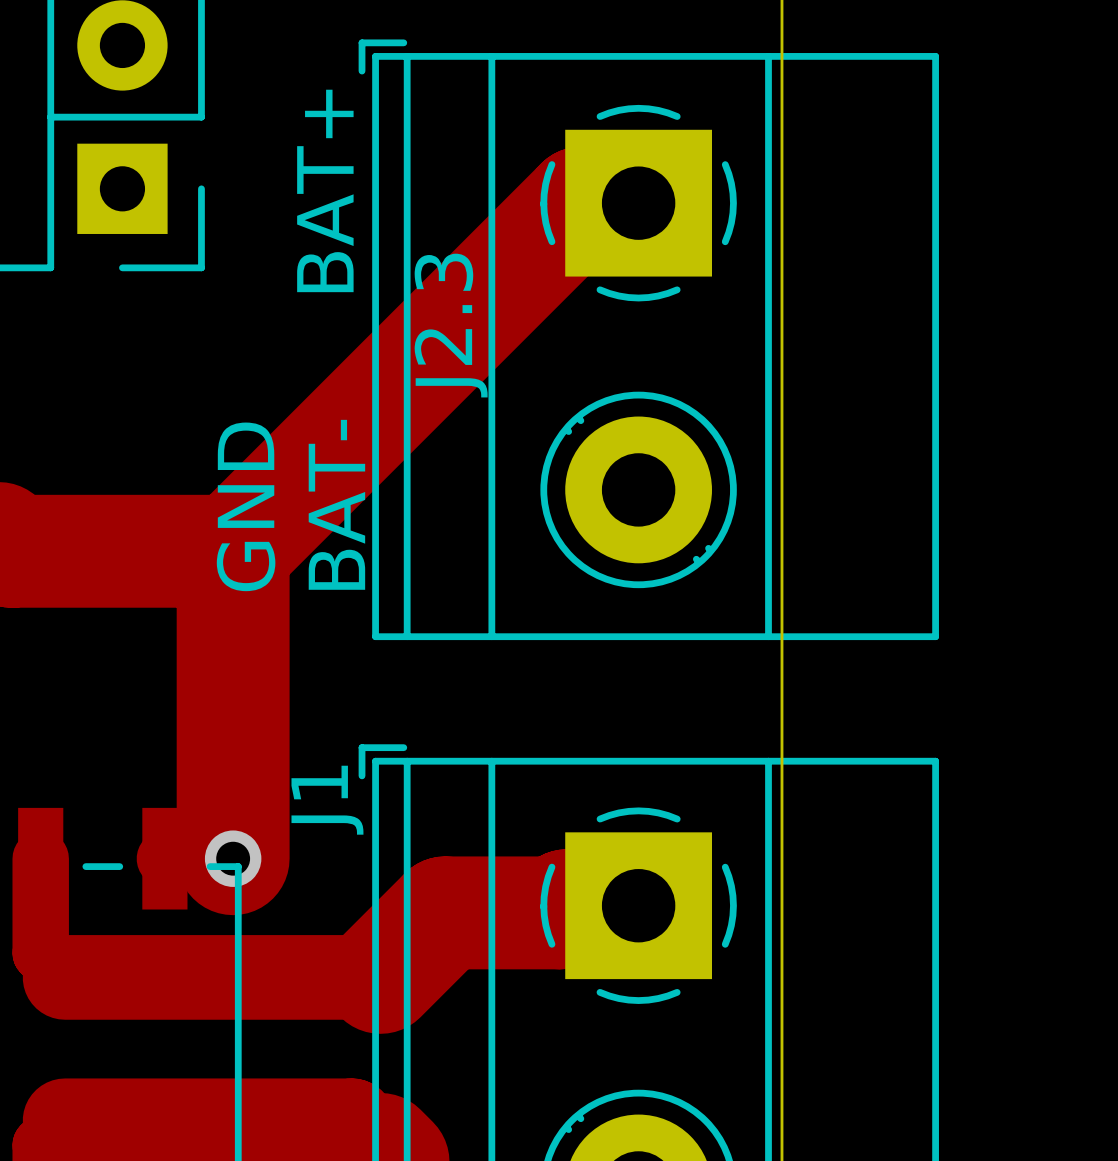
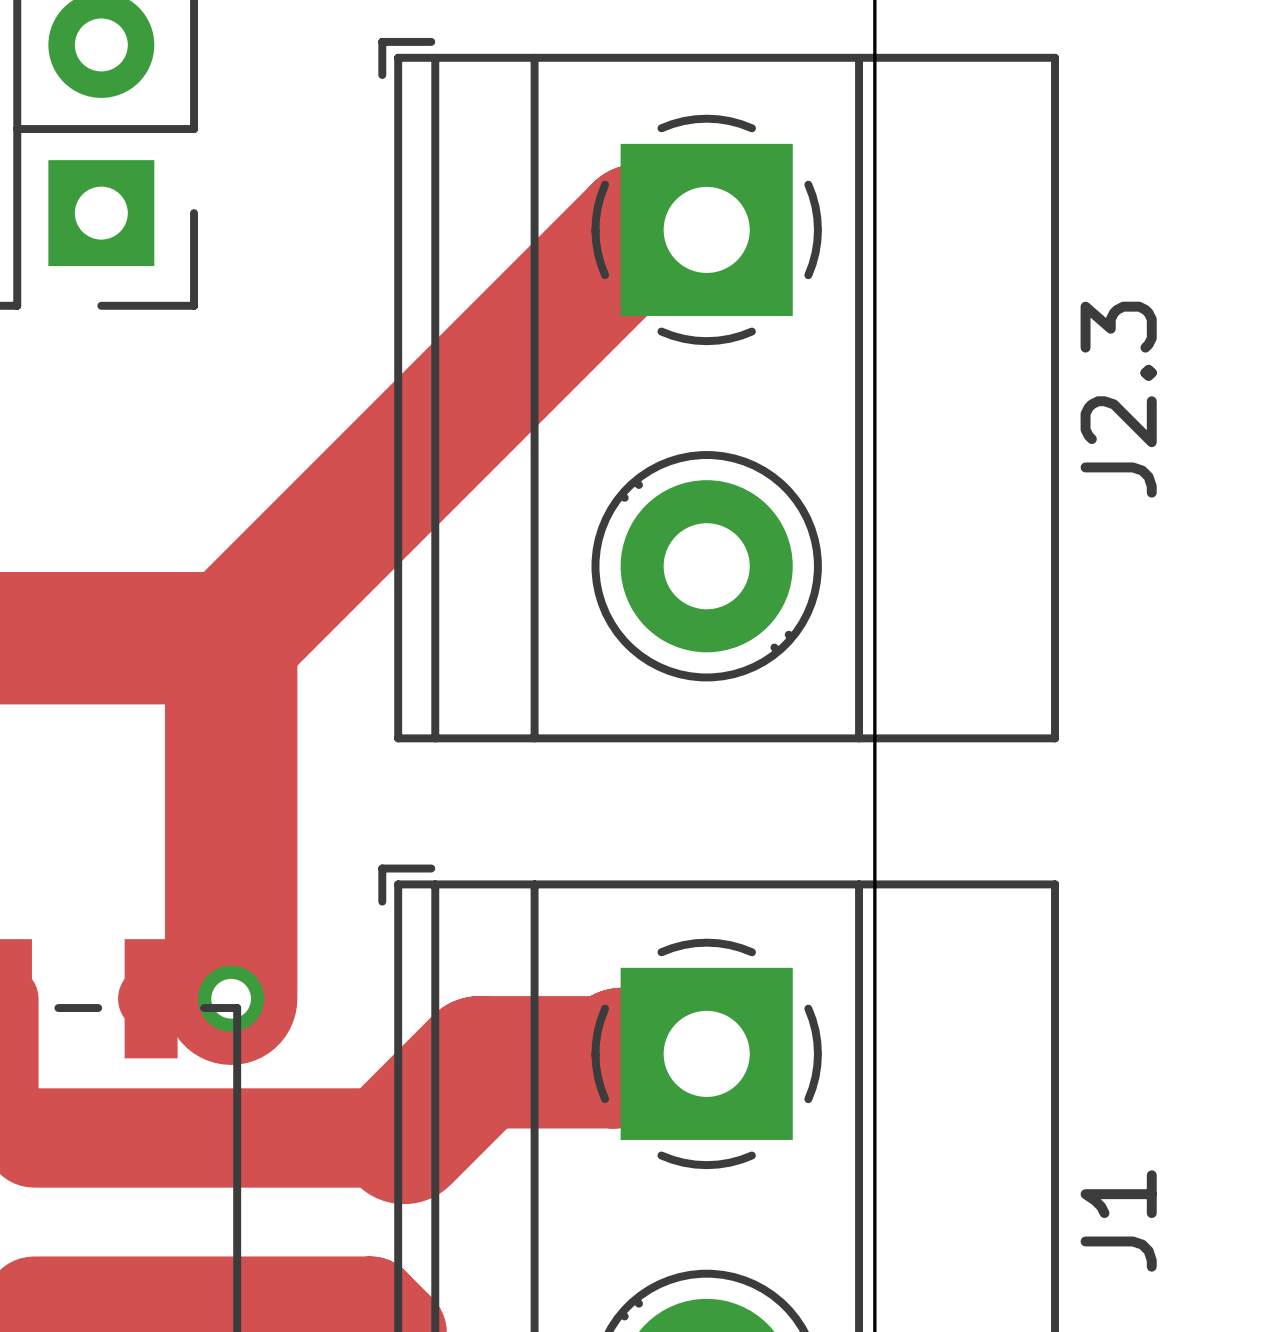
text: BAT+ (325, 190) -> none
J2.3 name position: J2.3 (451, 325) -> J2.3 (1118, 399)
text: BAT- (336, 504) -> none
text: GND (246, 506) -> none
J1 name position: J1 (327, 800) -> J1 (1118, 1220)

